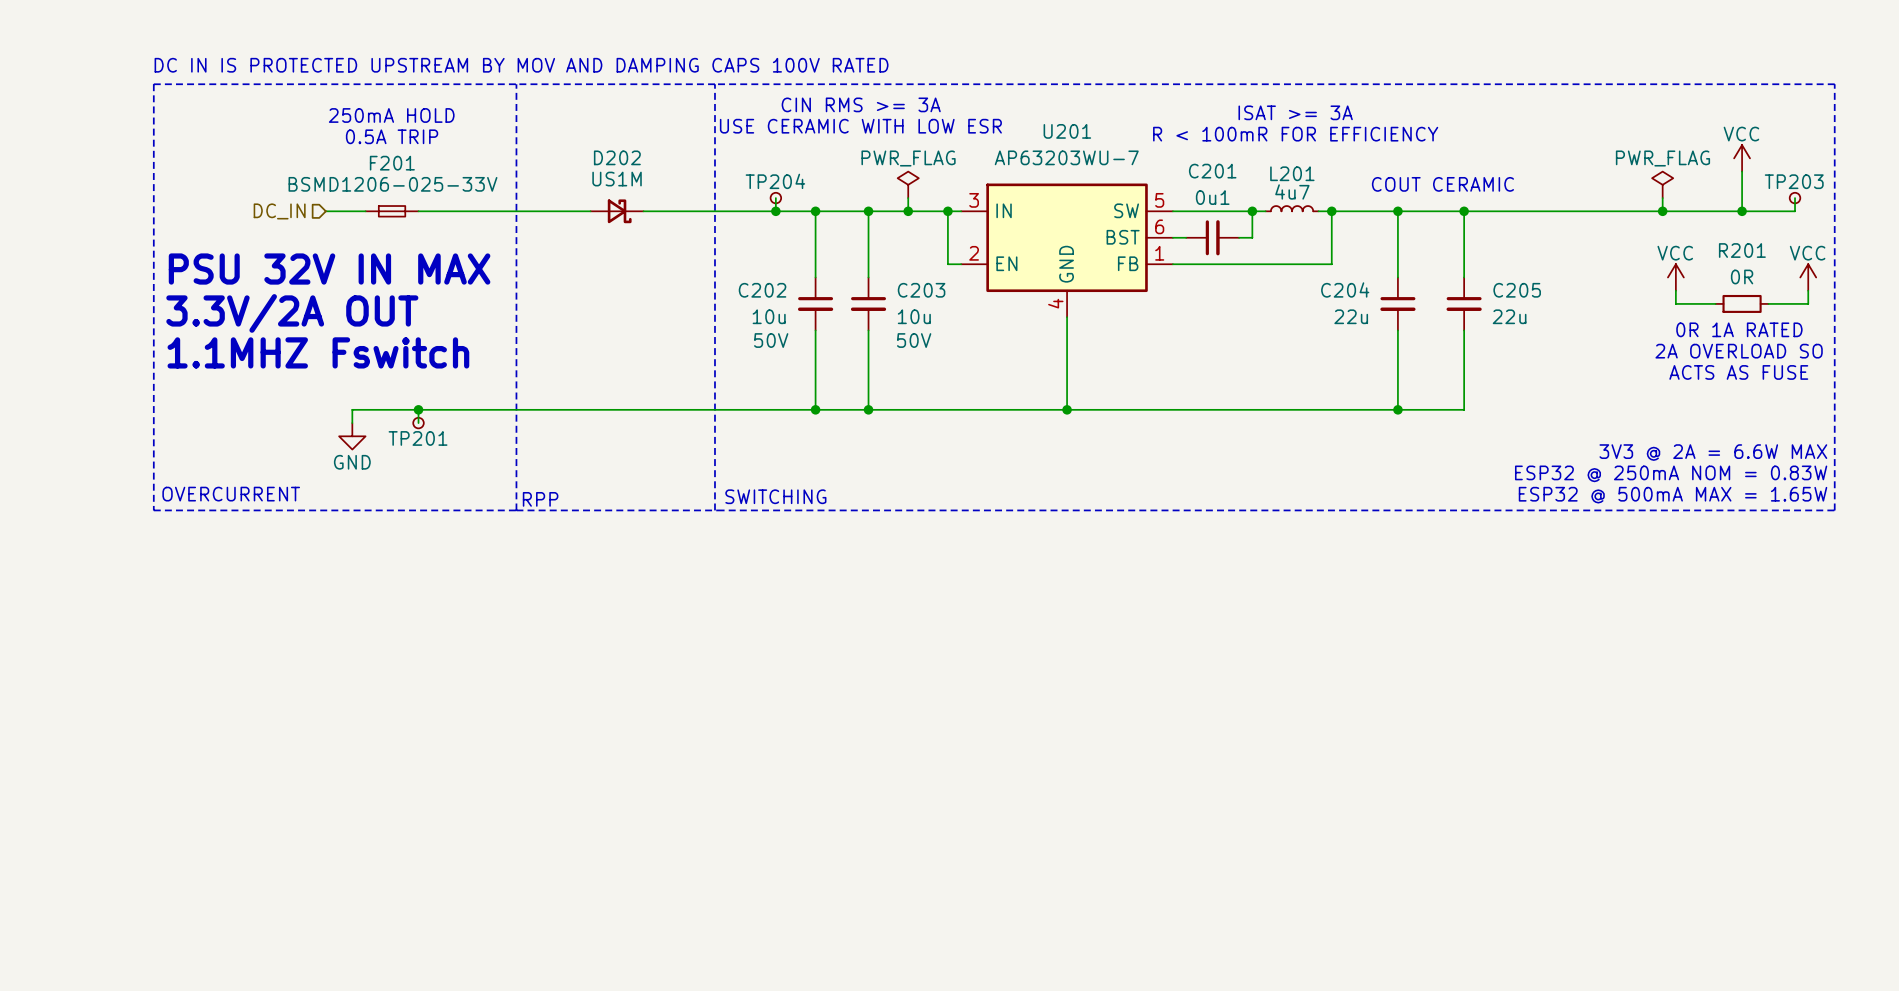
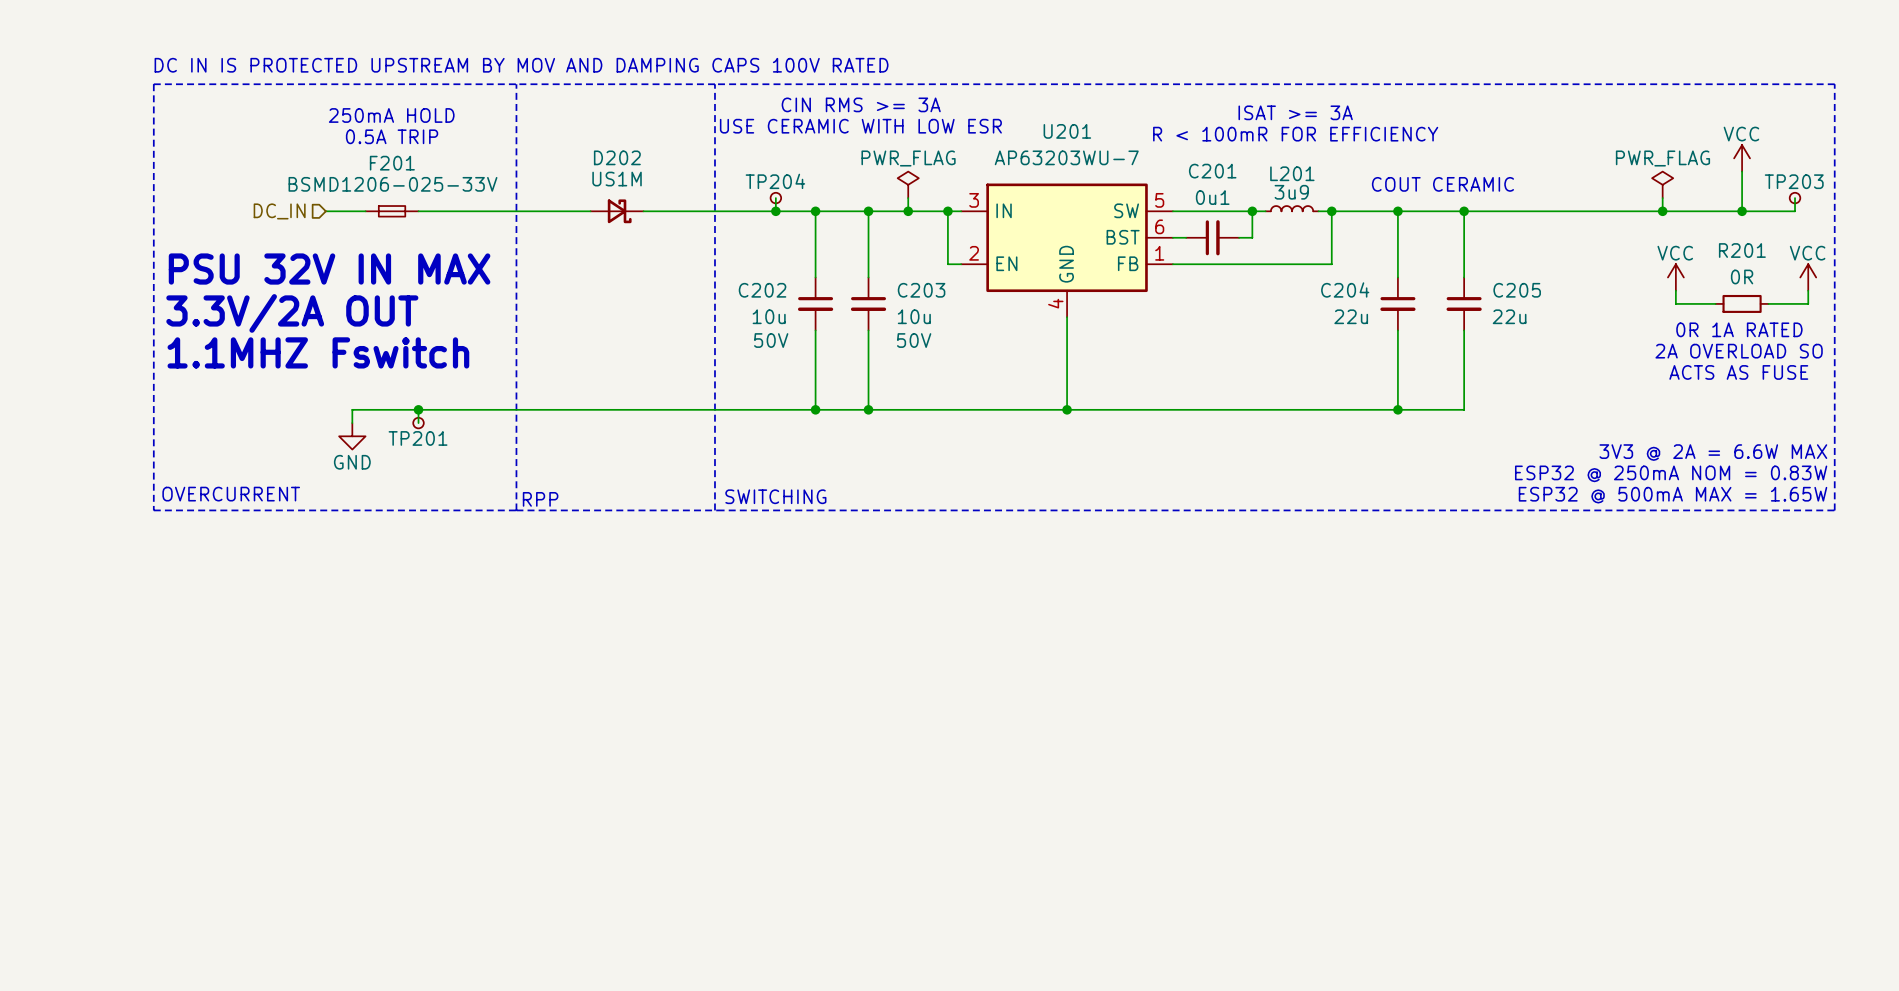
L201 value: 4u7 (1292, 191) -> 3u9 (1291, 192)

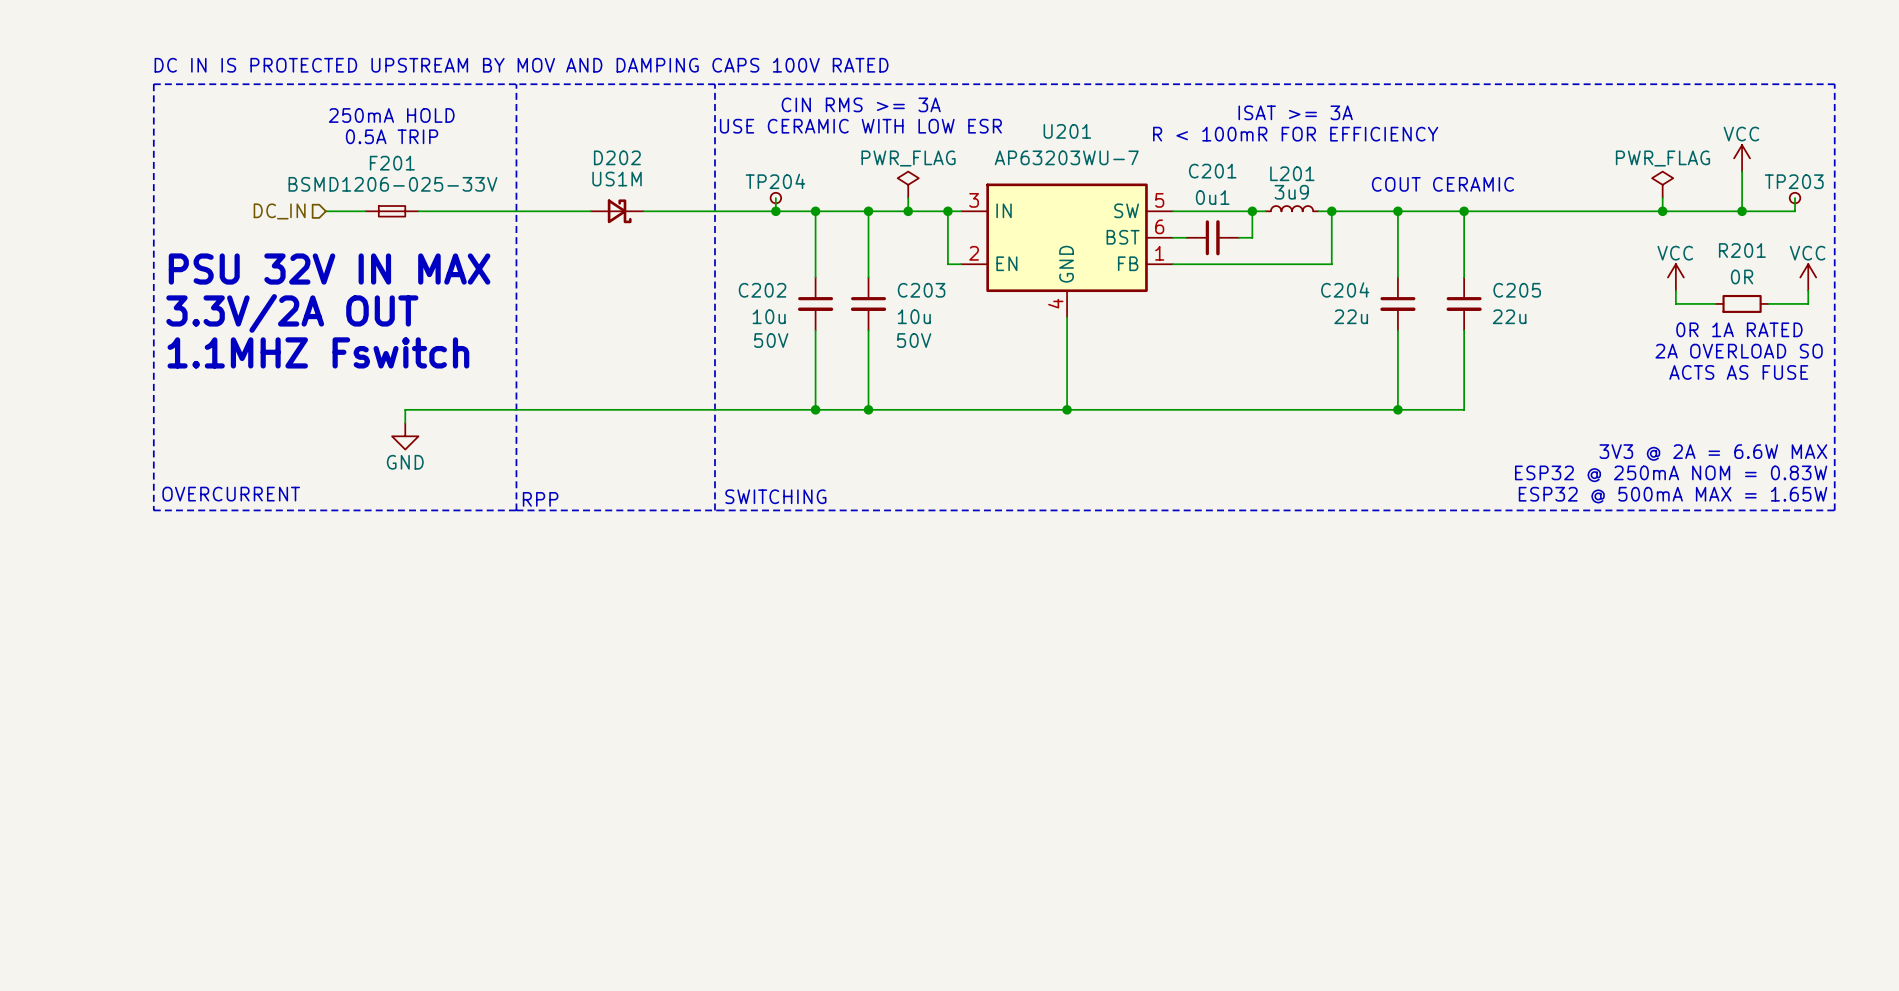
wire: (405, 409) (352, 409) (352, 423) -> (405, 409) (405, 423)
wire: (418, 409) (418, 423) -> none
junction: (418, 409) -> none
TP201: (418, 423) -> none
power symbol position: GND (352, 436) -> GND (405, 436)

